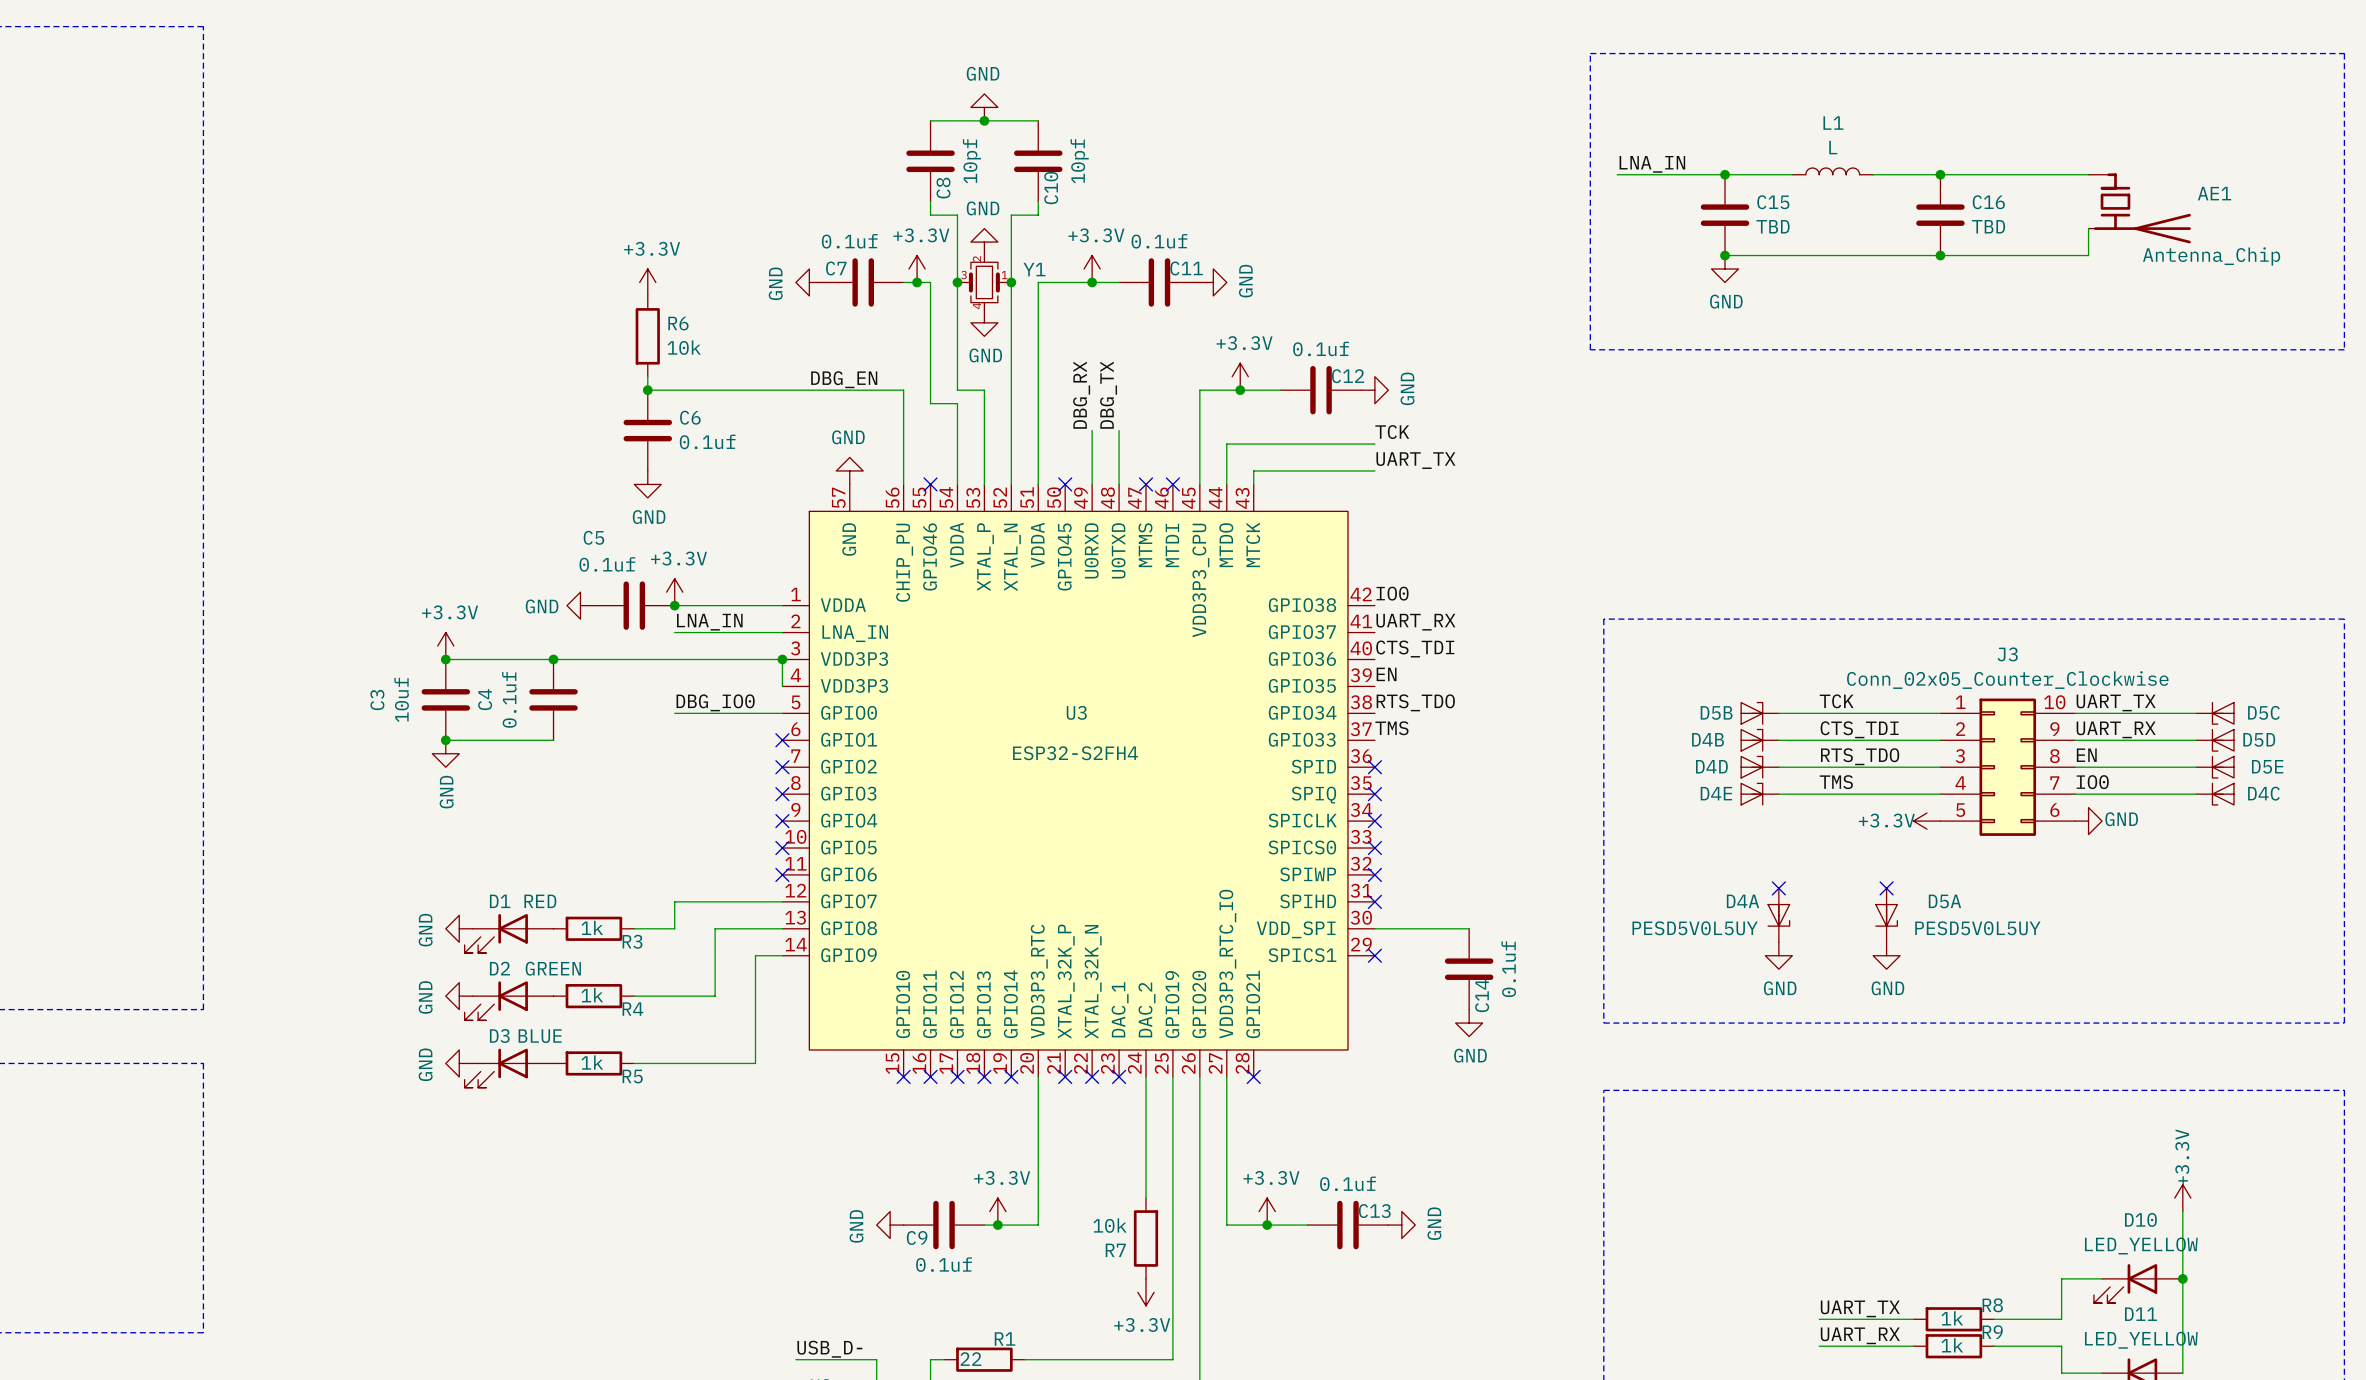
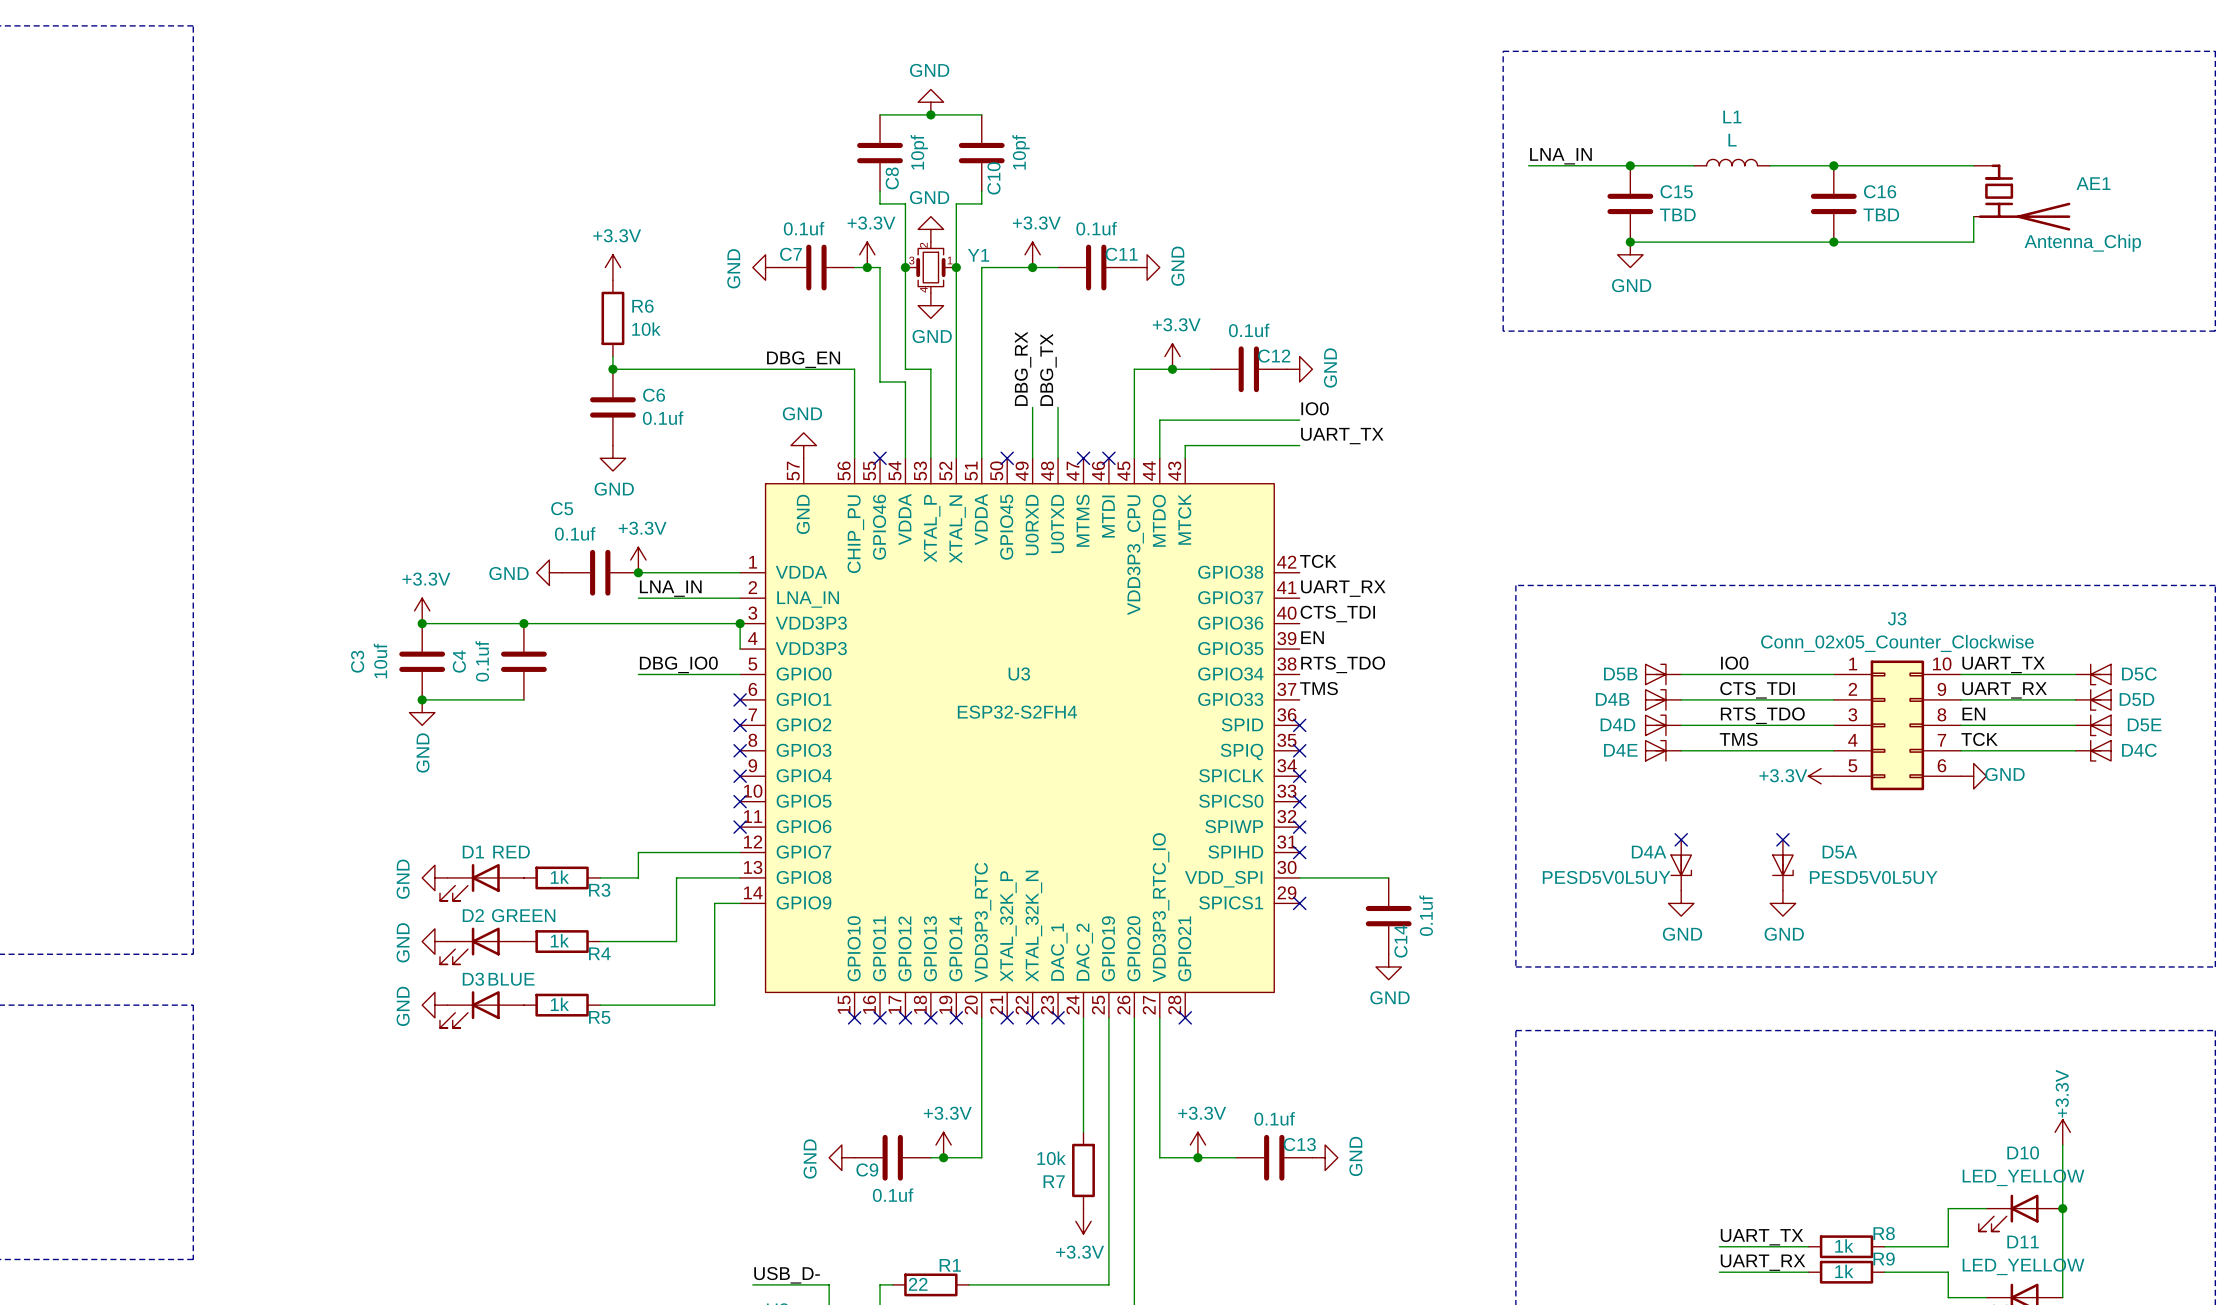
label: TCK (1392, 432) -> IO0 (1315, 408)
label: IO0 (1392, 593) -> TCK (1318, 561)
label: TCK (1836, 701) -> IO0 (1734, 663)
label: IO0 (2092, 782) -> TCK (1979, 739)

